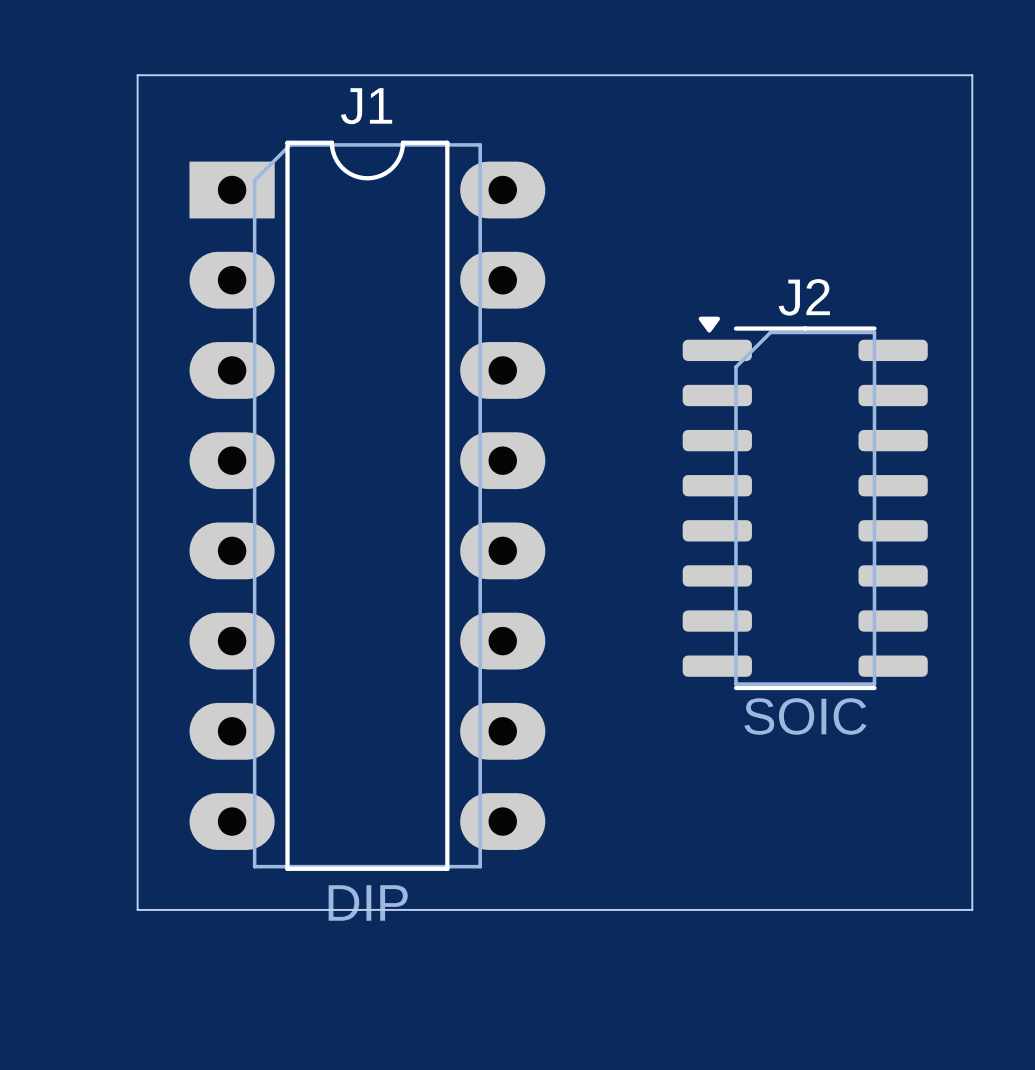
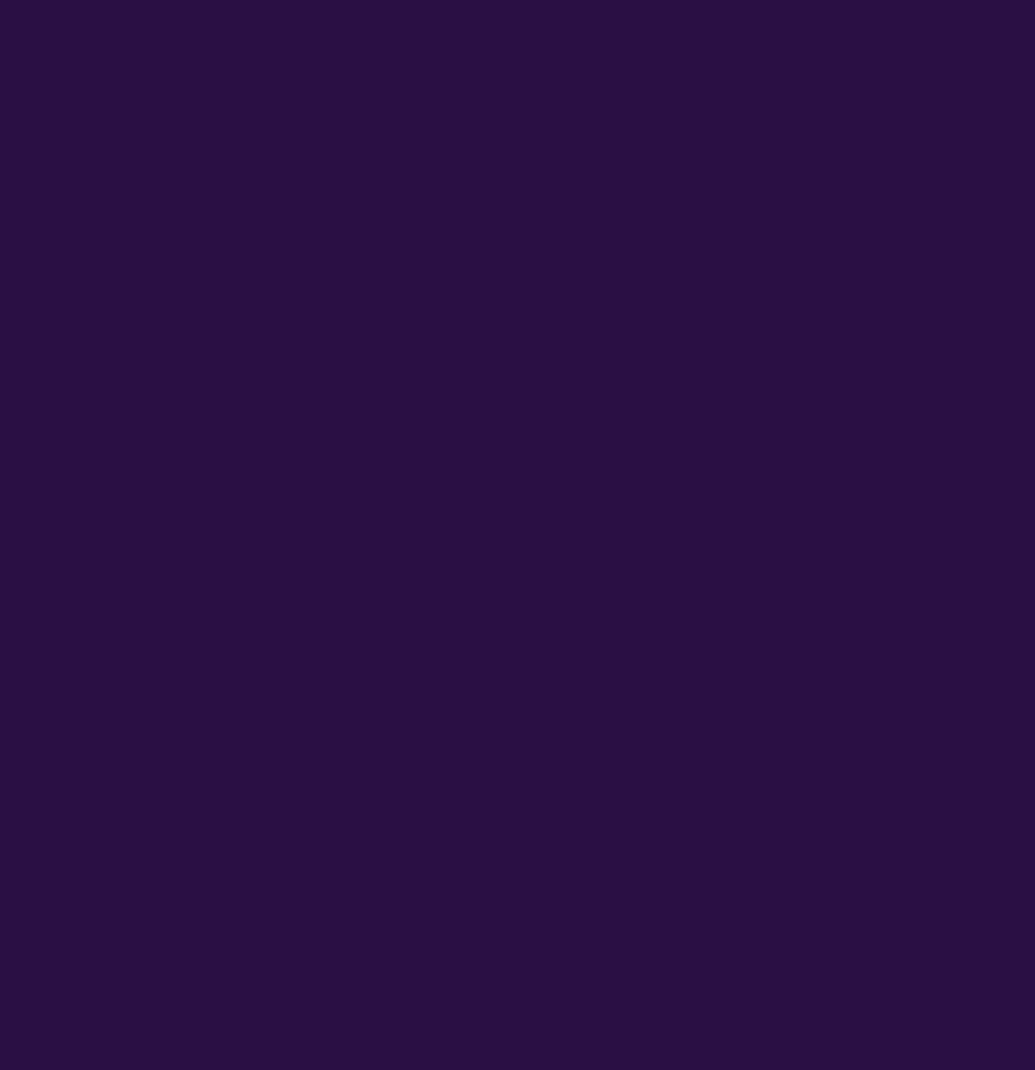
board edge: (137, 75) (972, 75) (972, 909) (137, 909) (137, 75) -> none
J2: SOIC (805, 503) -> none
J1: DIP (367, 505) -> none

